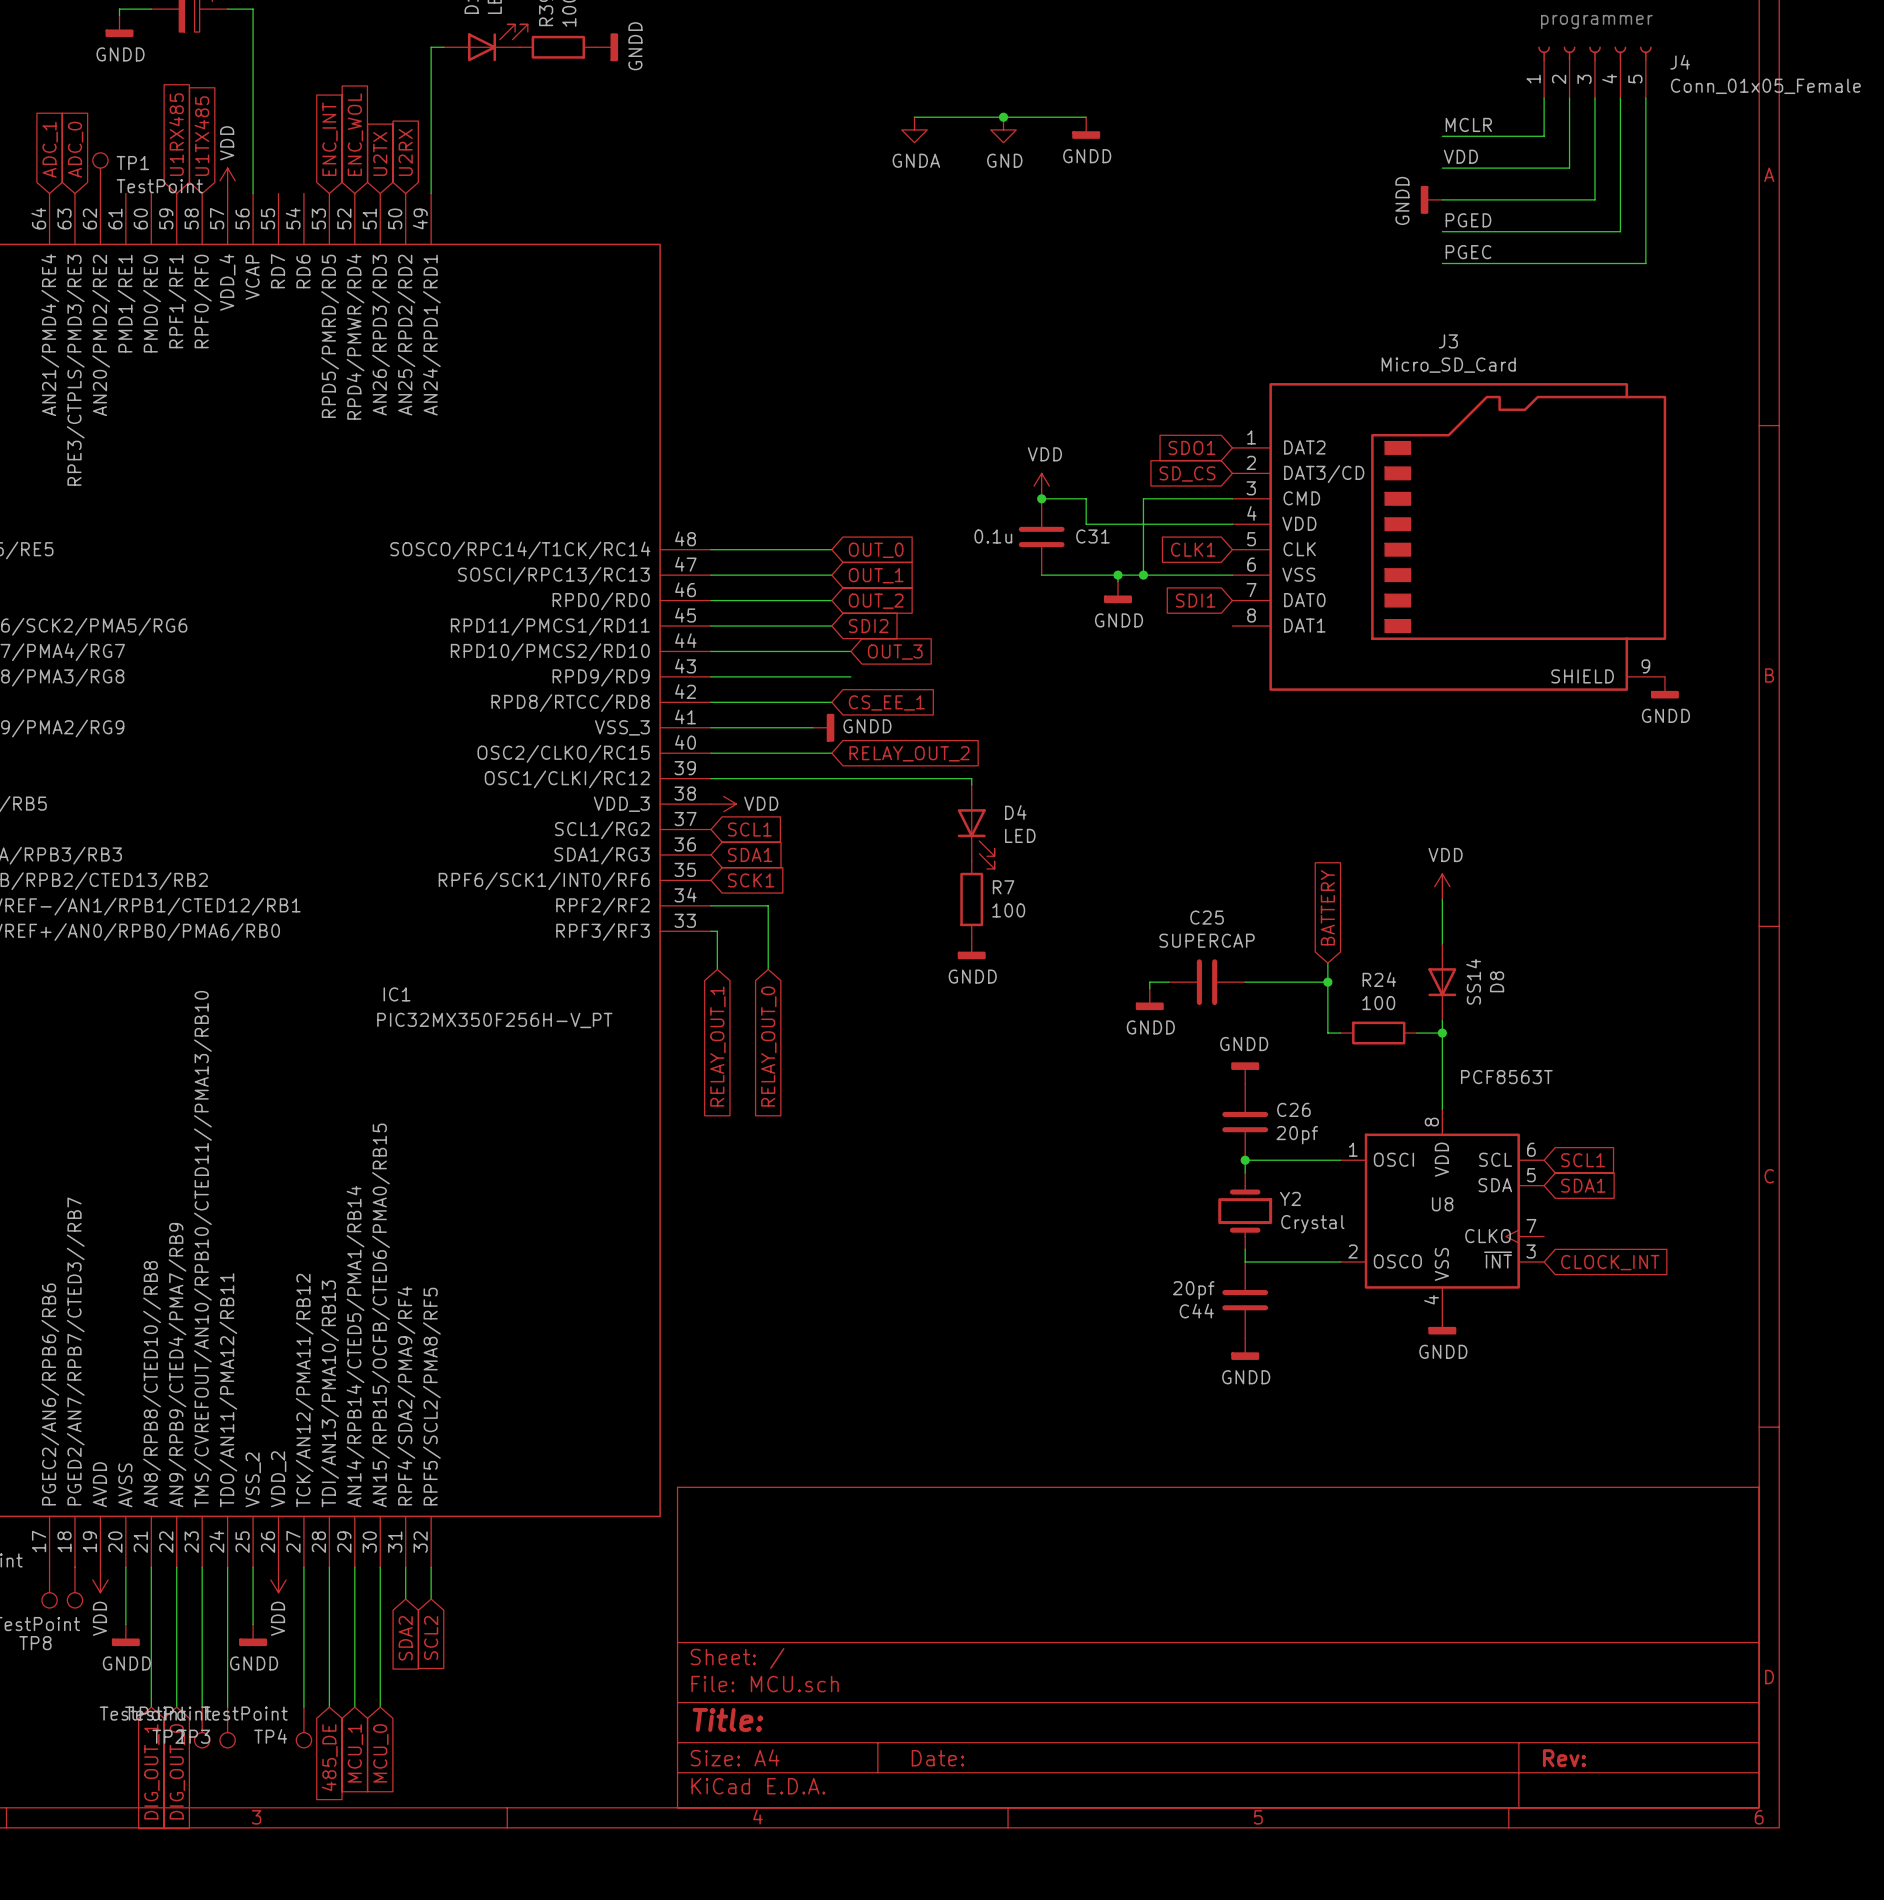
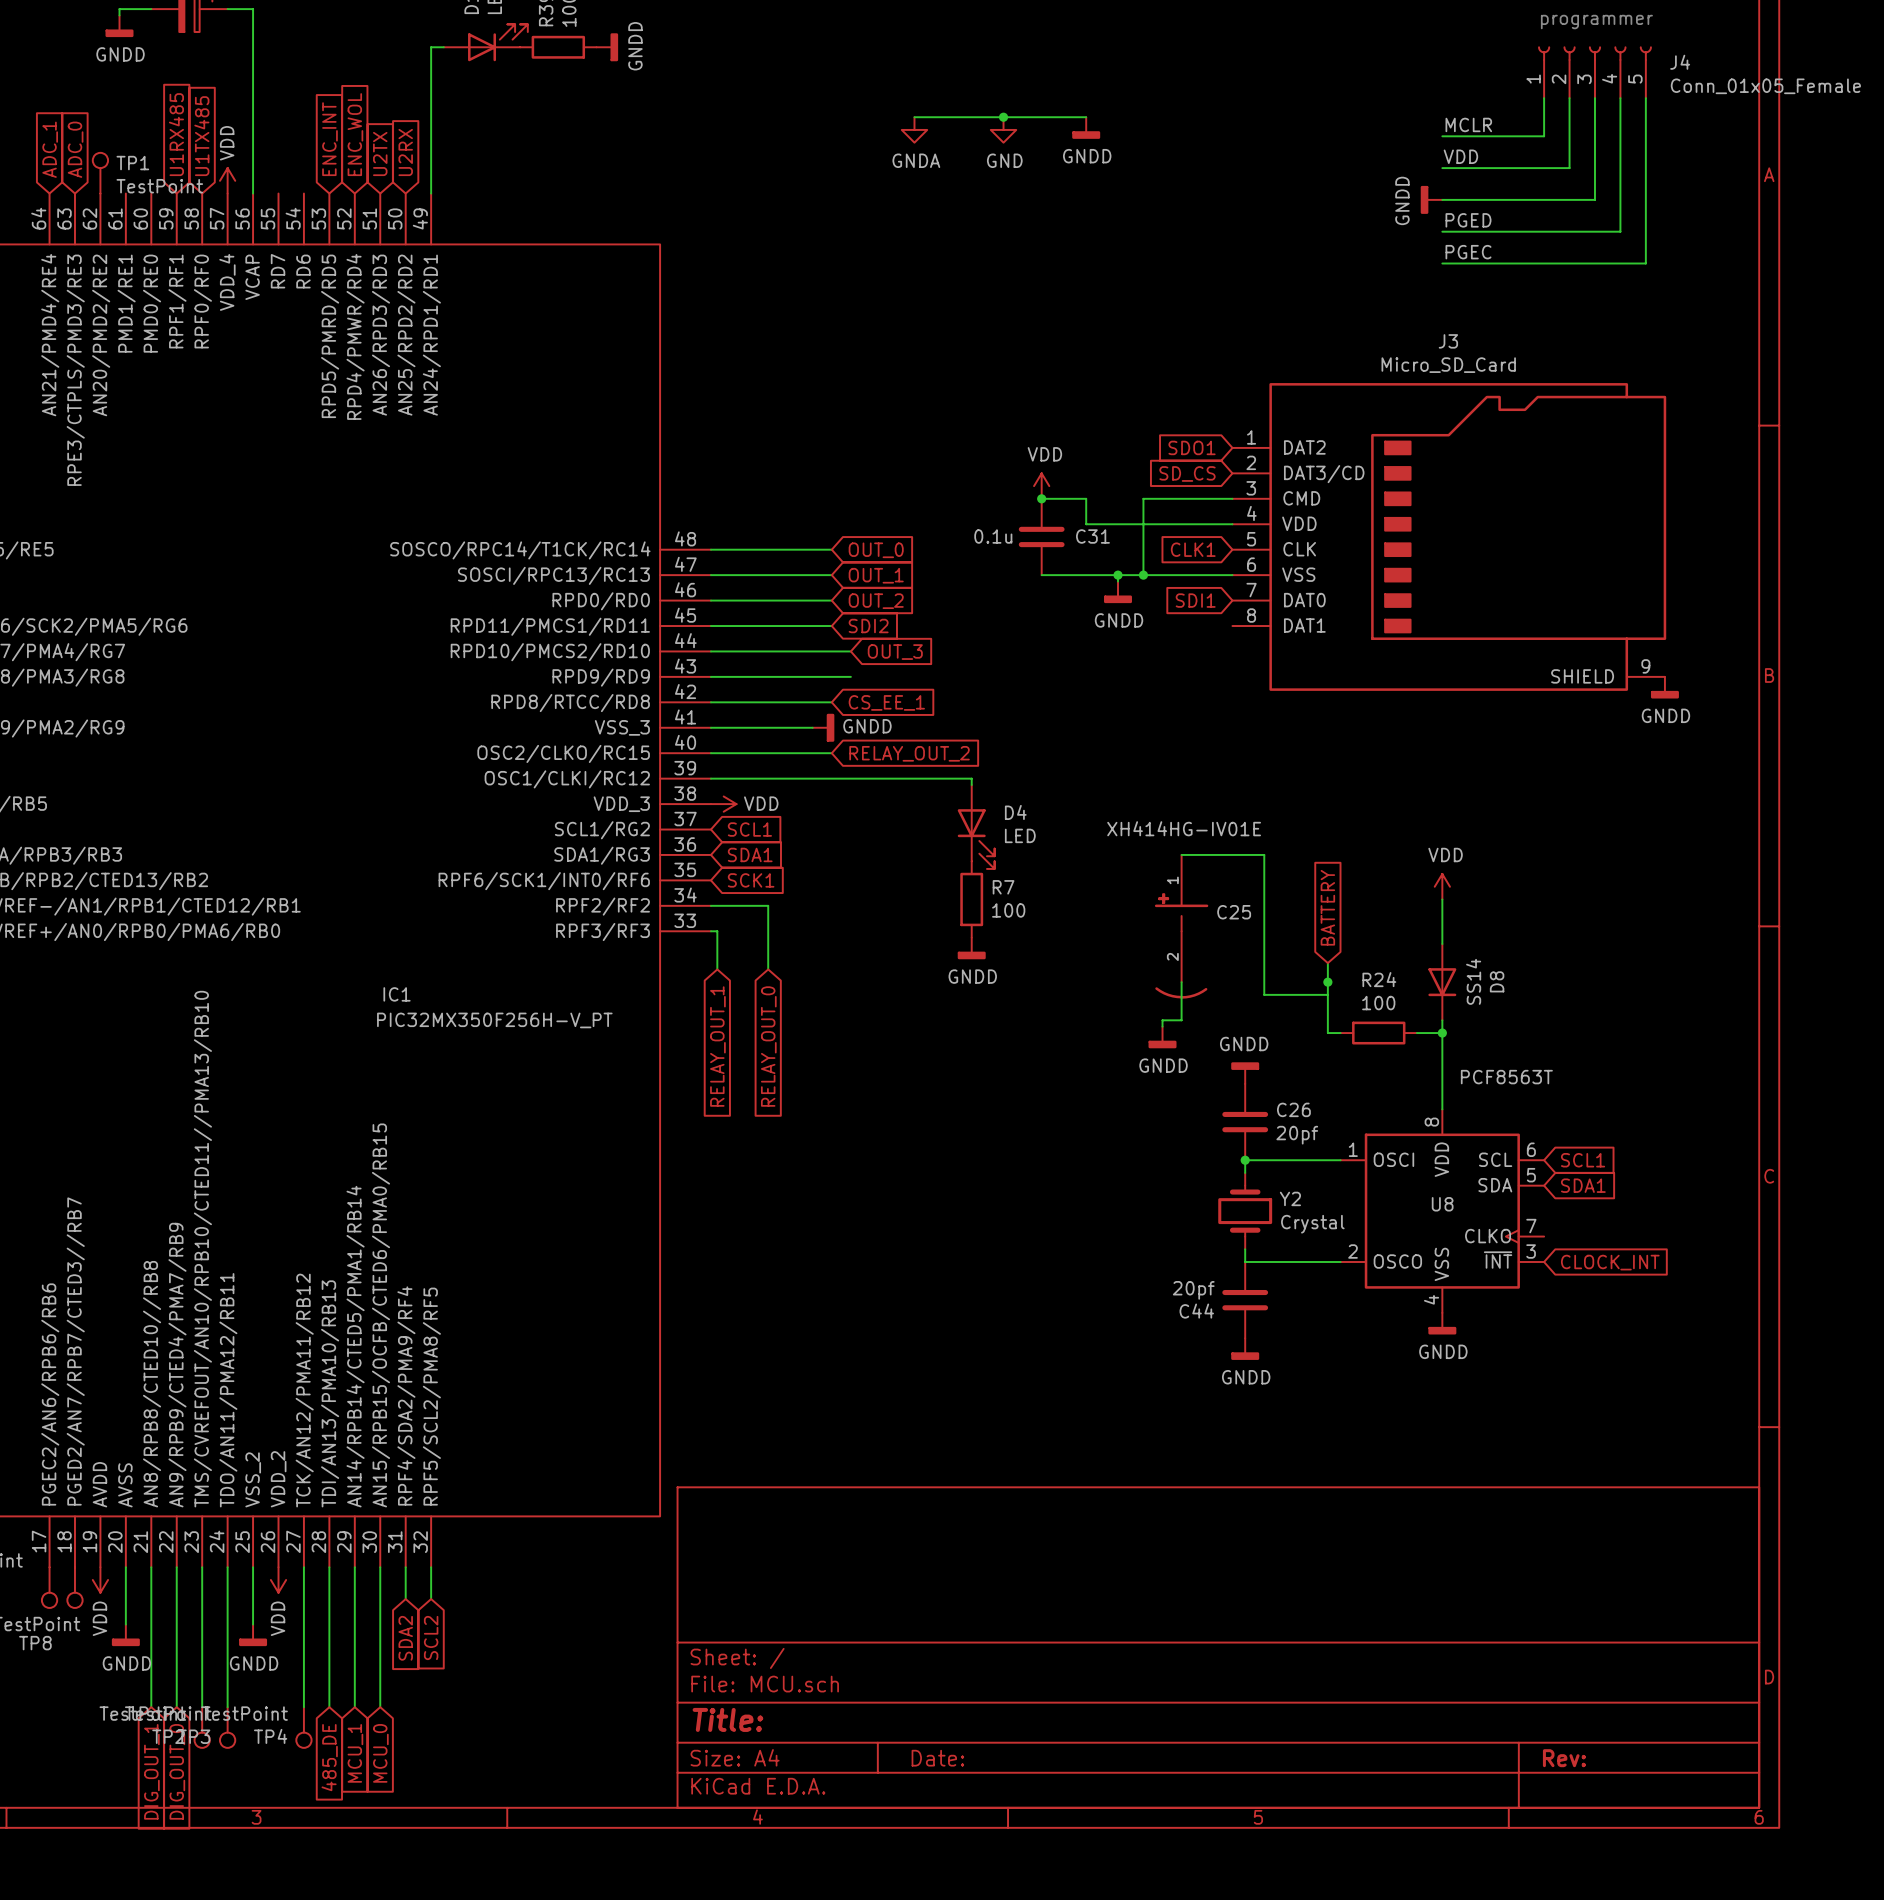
wire: none -> (1181, 854) (1264, 854) (1264, 994) (1327, 994)
C25 name position: C25 (1207, 917) -> C25 (1234, 912)
C25 value: SUPERCAP (1207, 940) -> XH414HG-IV01E (1184, 828)
C25 symbol: [1168, 959, 1246, 1006] -> [1154, 854, 1209, 999]
wire: (1168, 982) (1149, 982) (1149, 988) -> none
wire: none -> (1181, 982) (1181, 1020) (1162, 1020) (1162, 1026)
wire: (1245, 982) (1327, 982) -> none
power symbol position: GNDD (1149, 999) -> GNDD (1162, 1037)

